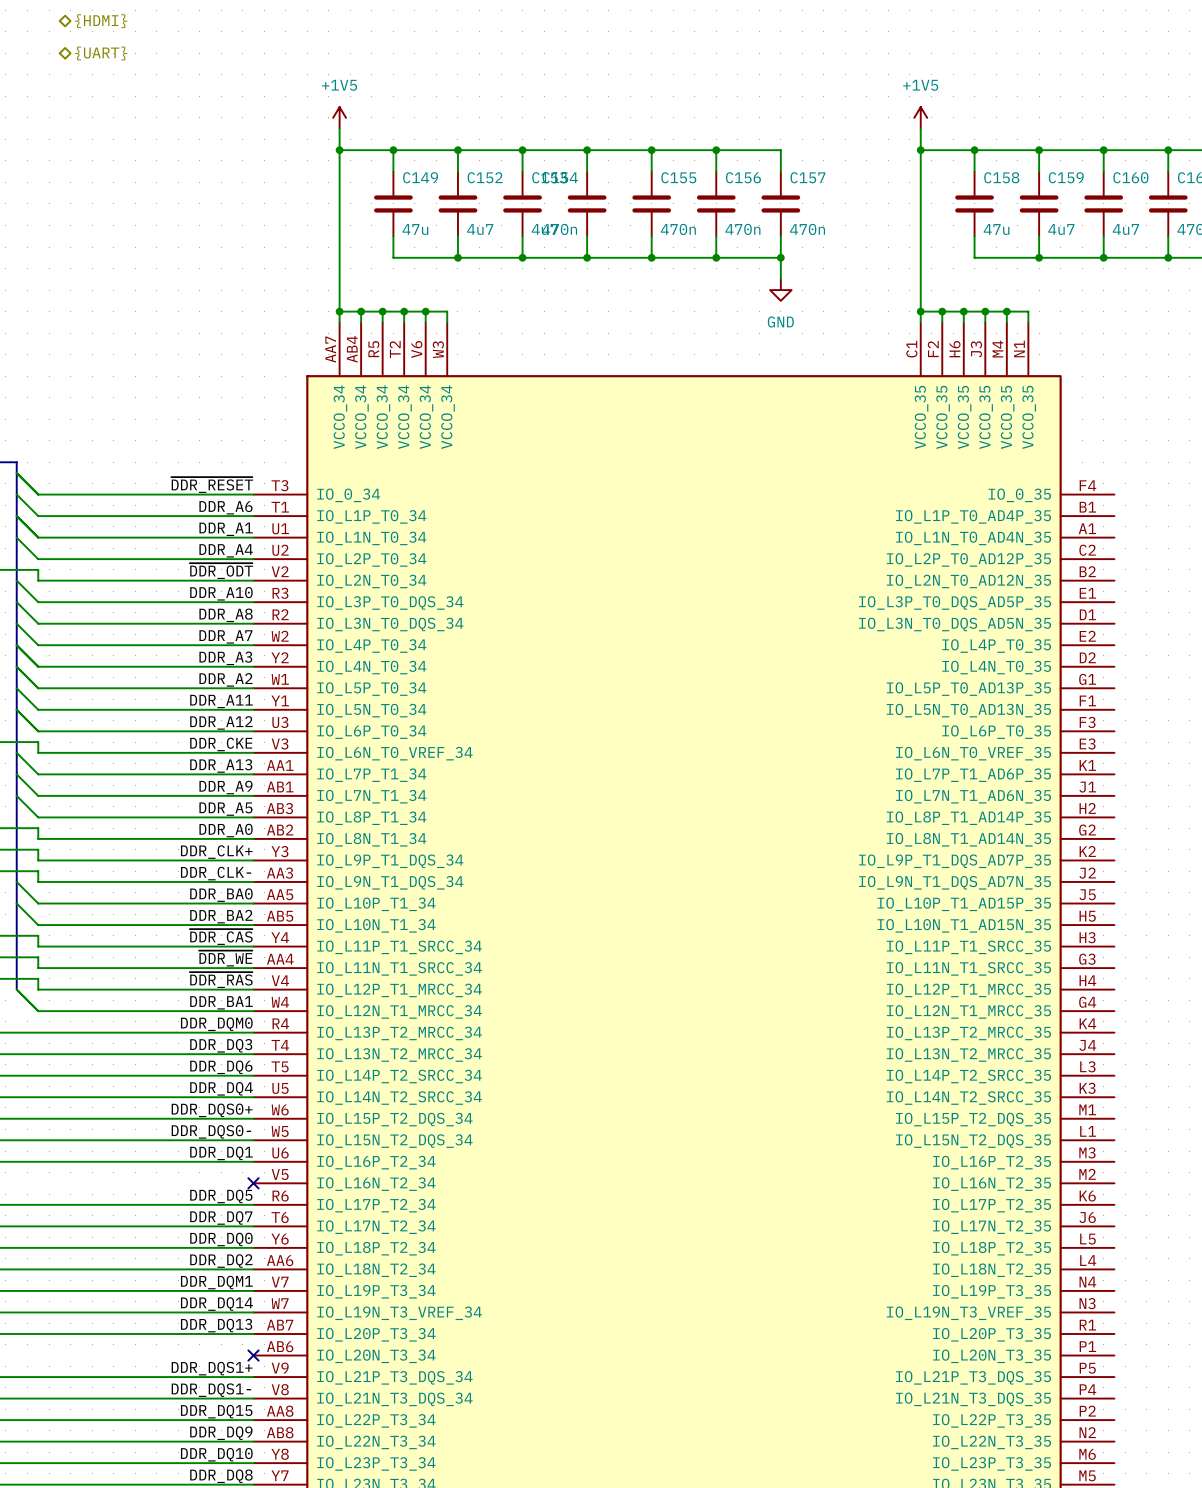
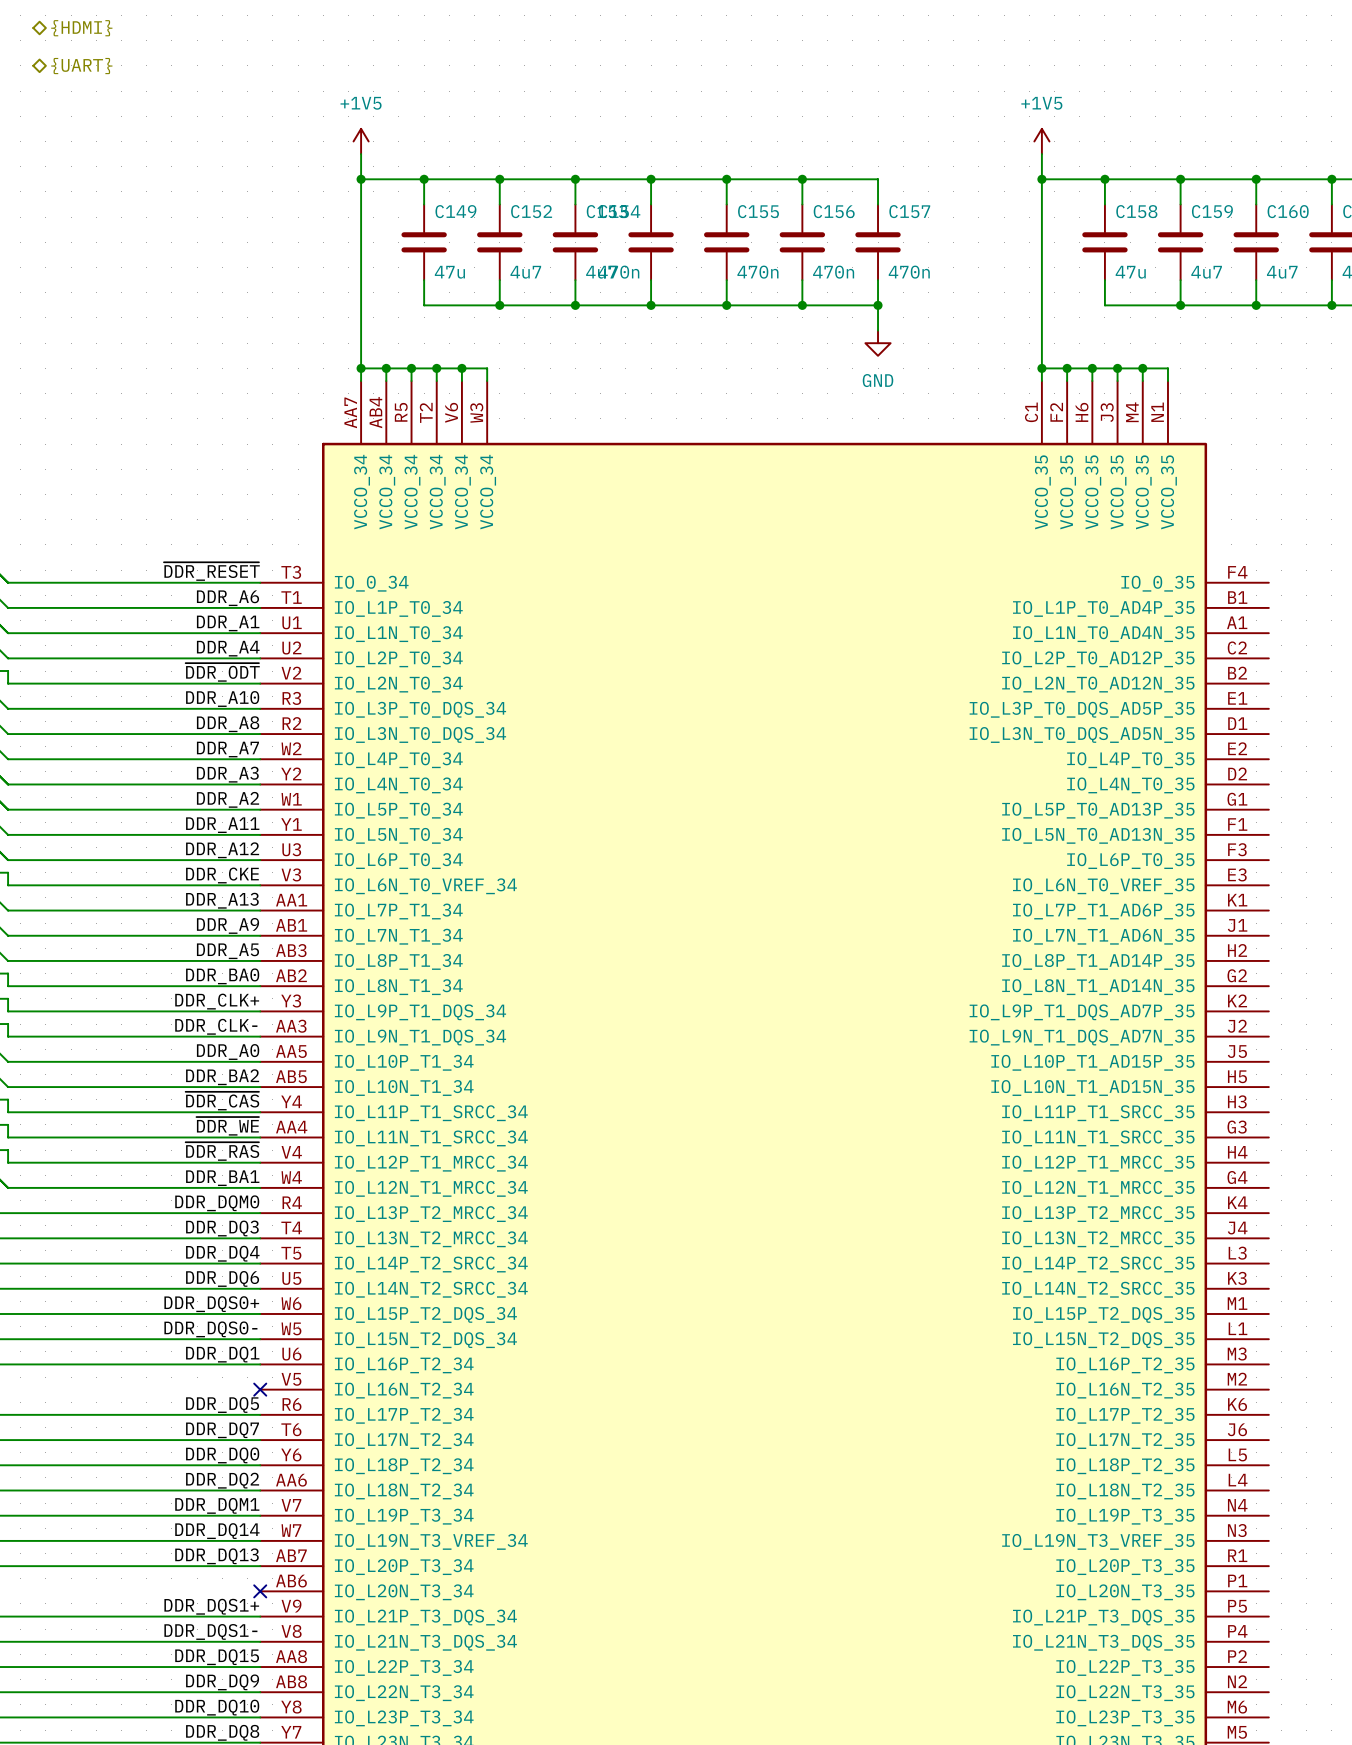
label: DDR_A0 (226, 830) -> DDR_BA0 (222, 976)
label: DDR_BA0 (221, 895) -> DDR_A0 (228, 1052)
label: DDR_DQ6 (221, 1067) -> DDR_DQ4 (222, 1253)
label: DDR_DQ4 (221, 1088) -> DDR_DQ6 (222, 1278)

